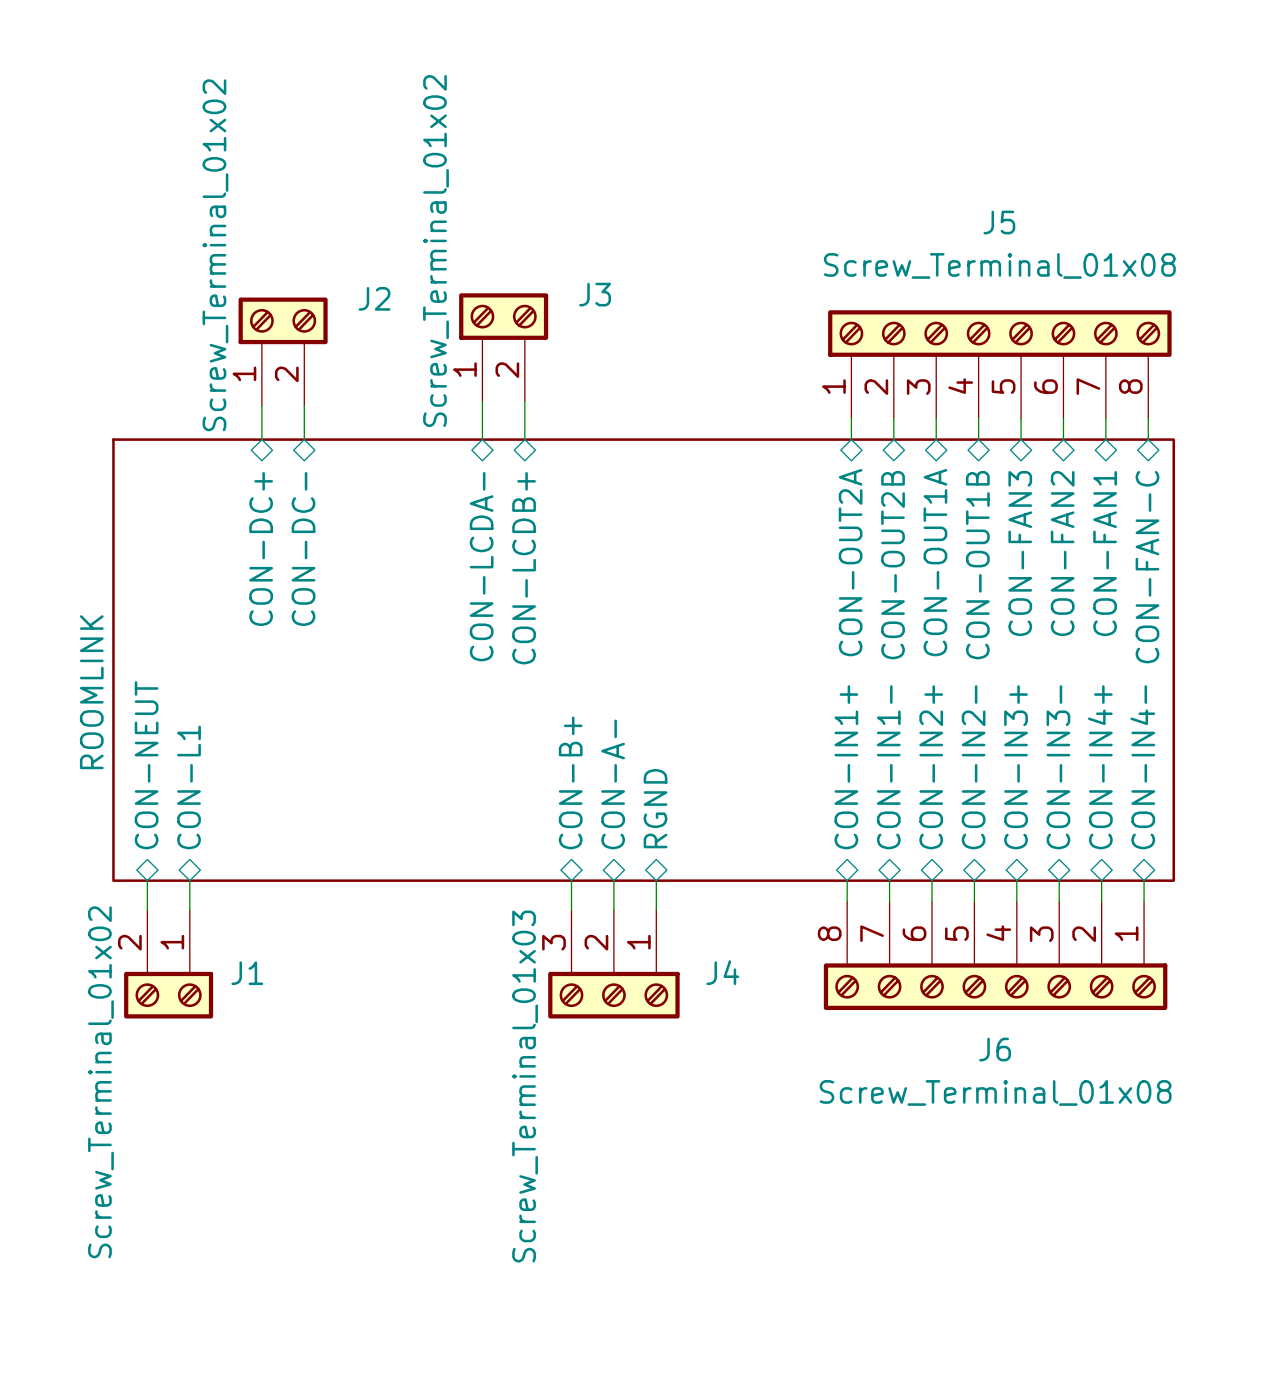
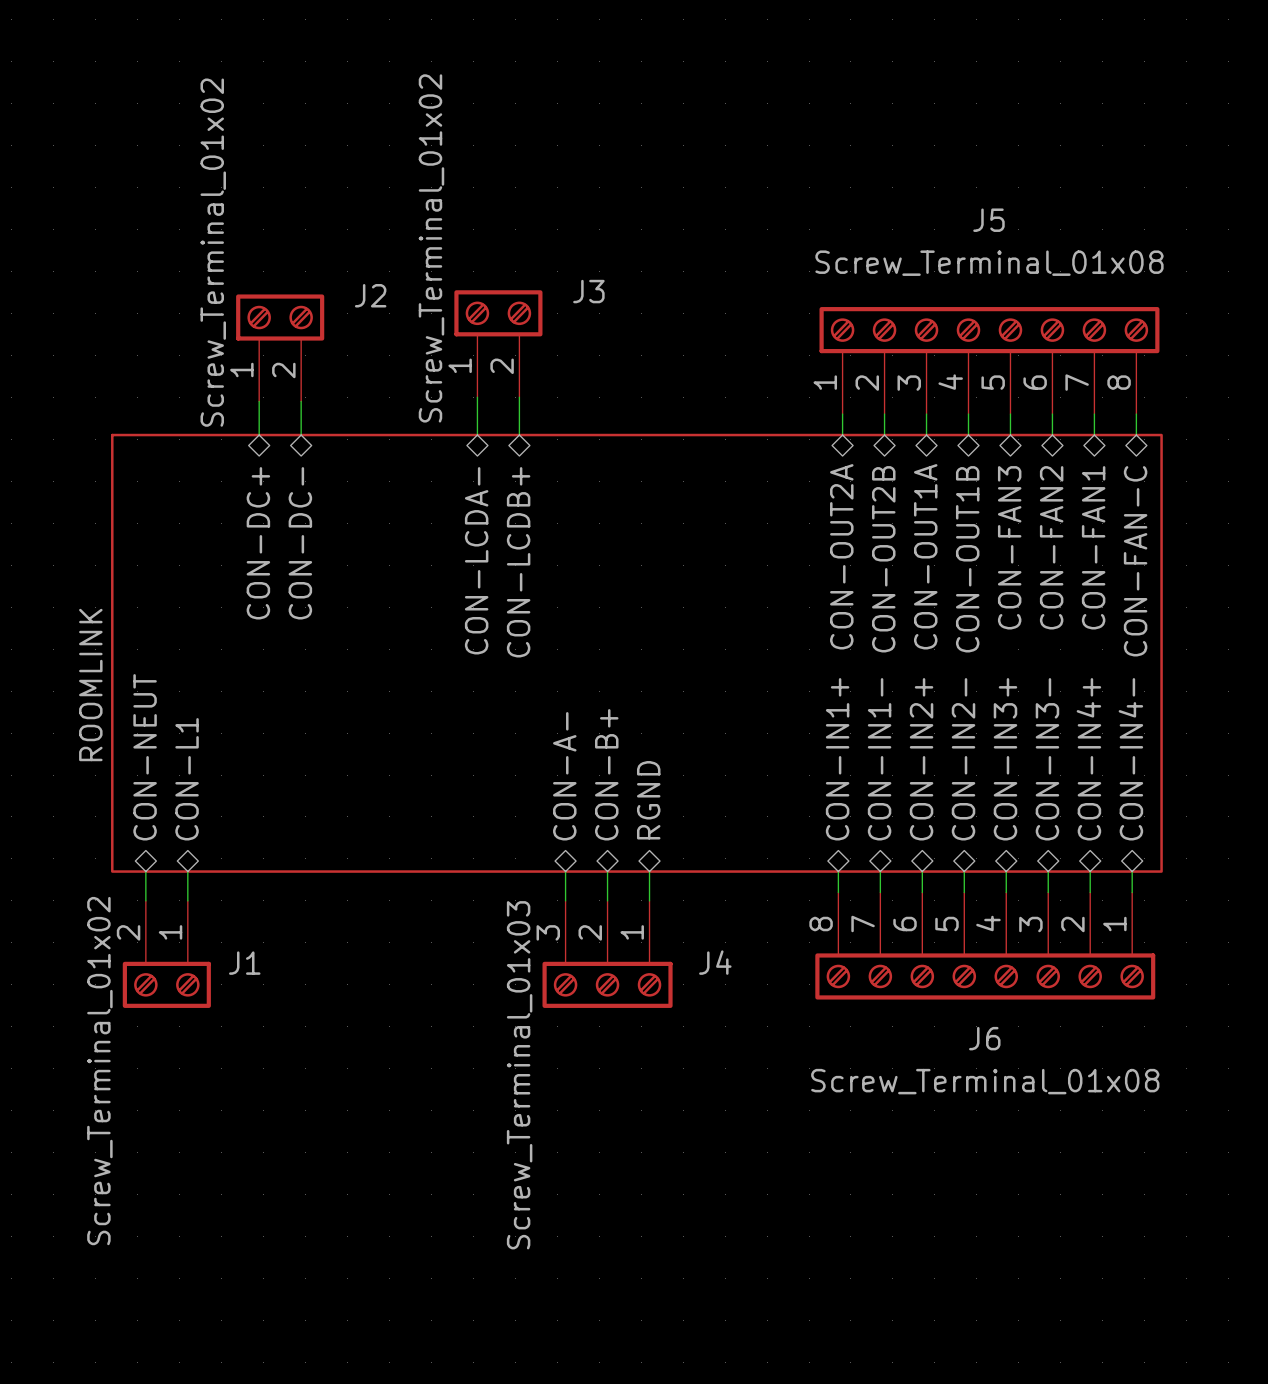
sheet pin: CON-B+ (570, 782) -> CON-A- (564, 776)
sheet pin: CON-A- (613, 784) -> CON-B+ (606, 774)

